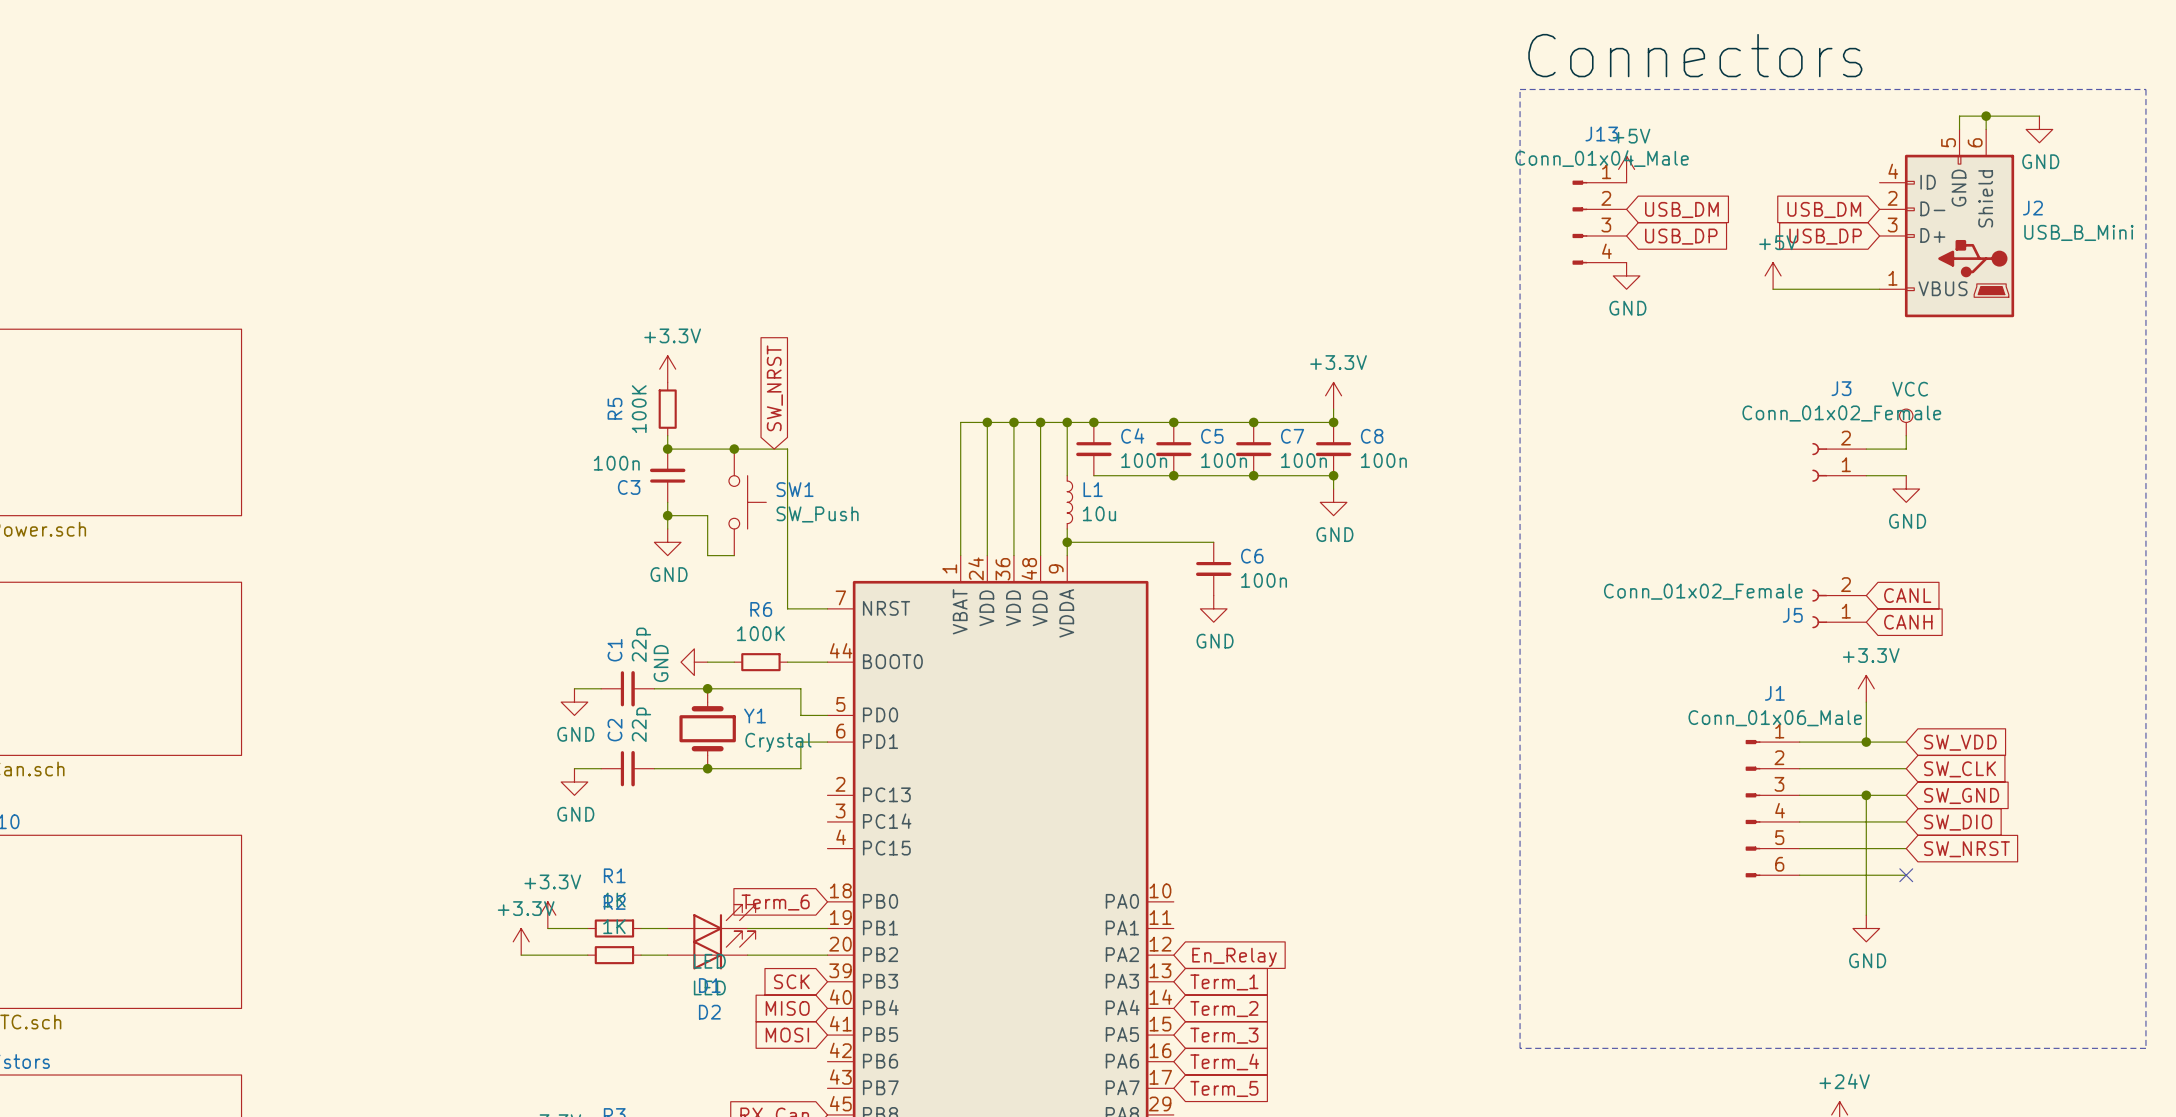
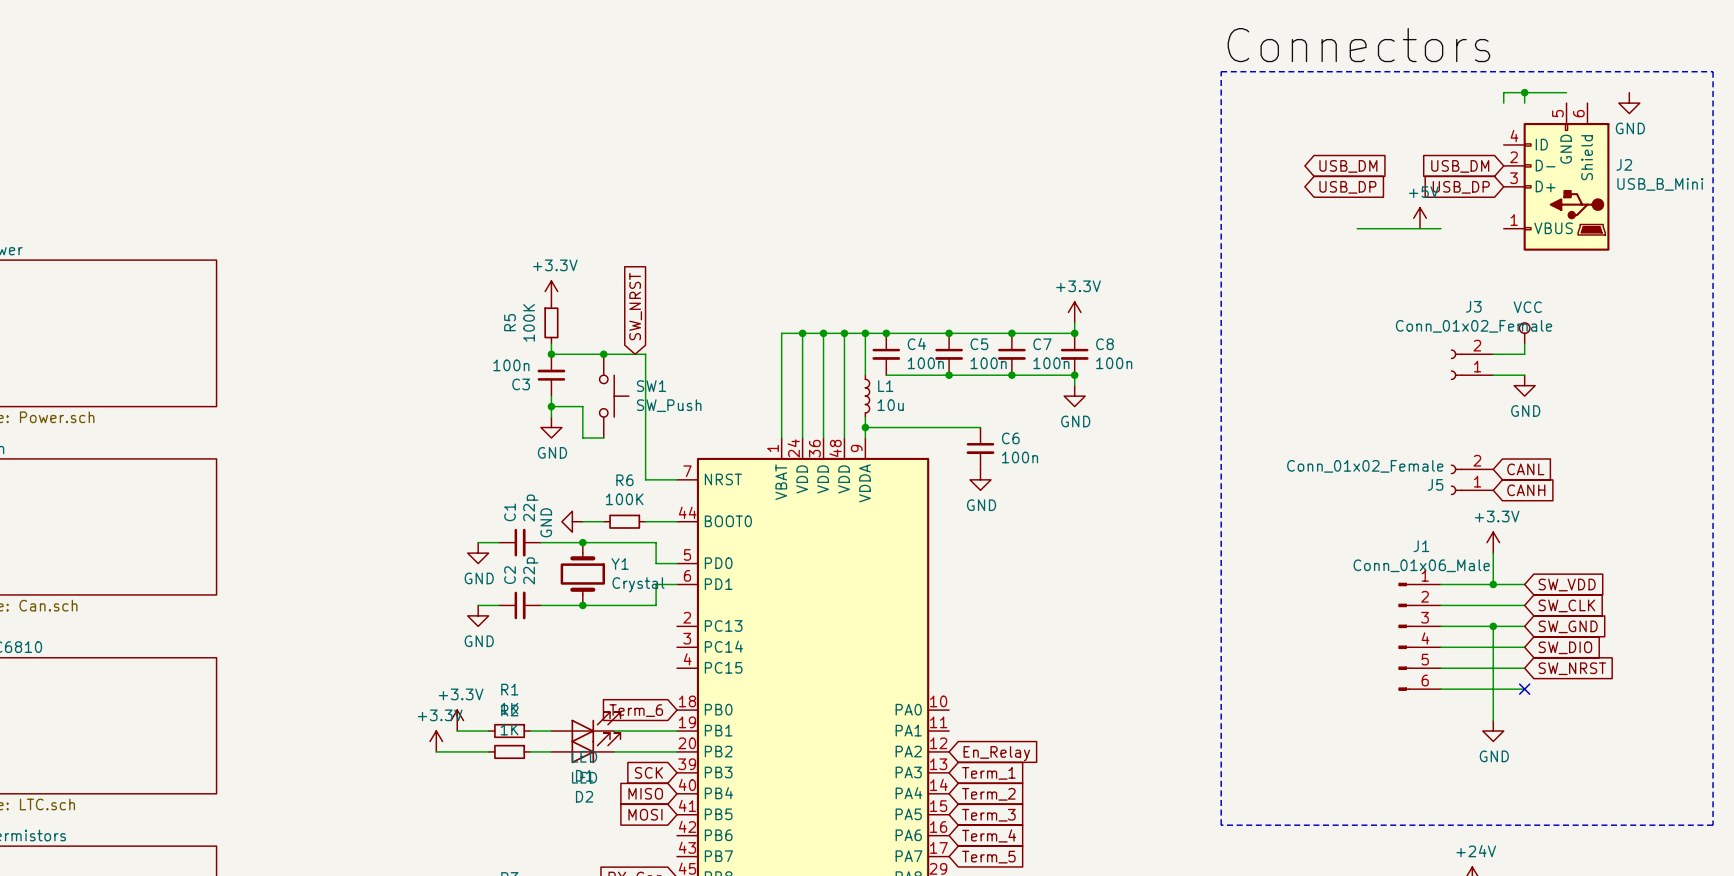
junction: none -> (1524, 92)
wire: (1986, 116) (1986, 129) -> (1524, 92) (1524, 103)
junction: (1986, 116) -> none
wire: (2039, 116) (1959, 116) (1959, 129) -> (1566, 92) (1503, 92) (1503, 103)
power symbol: +5V (1626, 169) -> none
J13: Conn_01x04_Male (1599, 222) -> none
power symbol: GND (1626, 275) -> none
wire: (1799, 289) (1879, 289) -> (1357, 228) (1420, 228)

